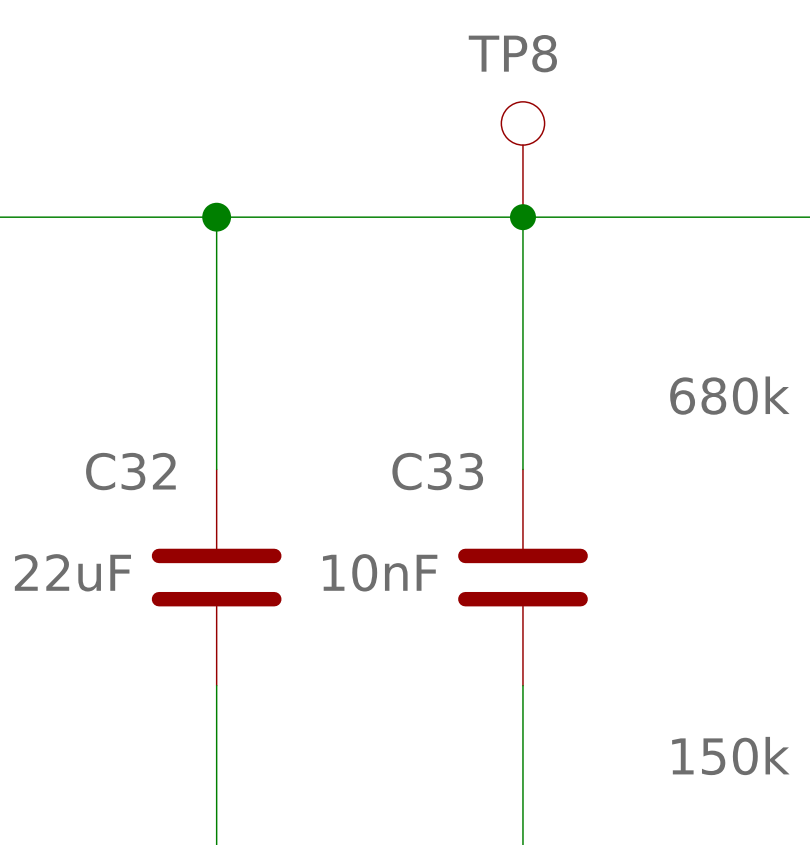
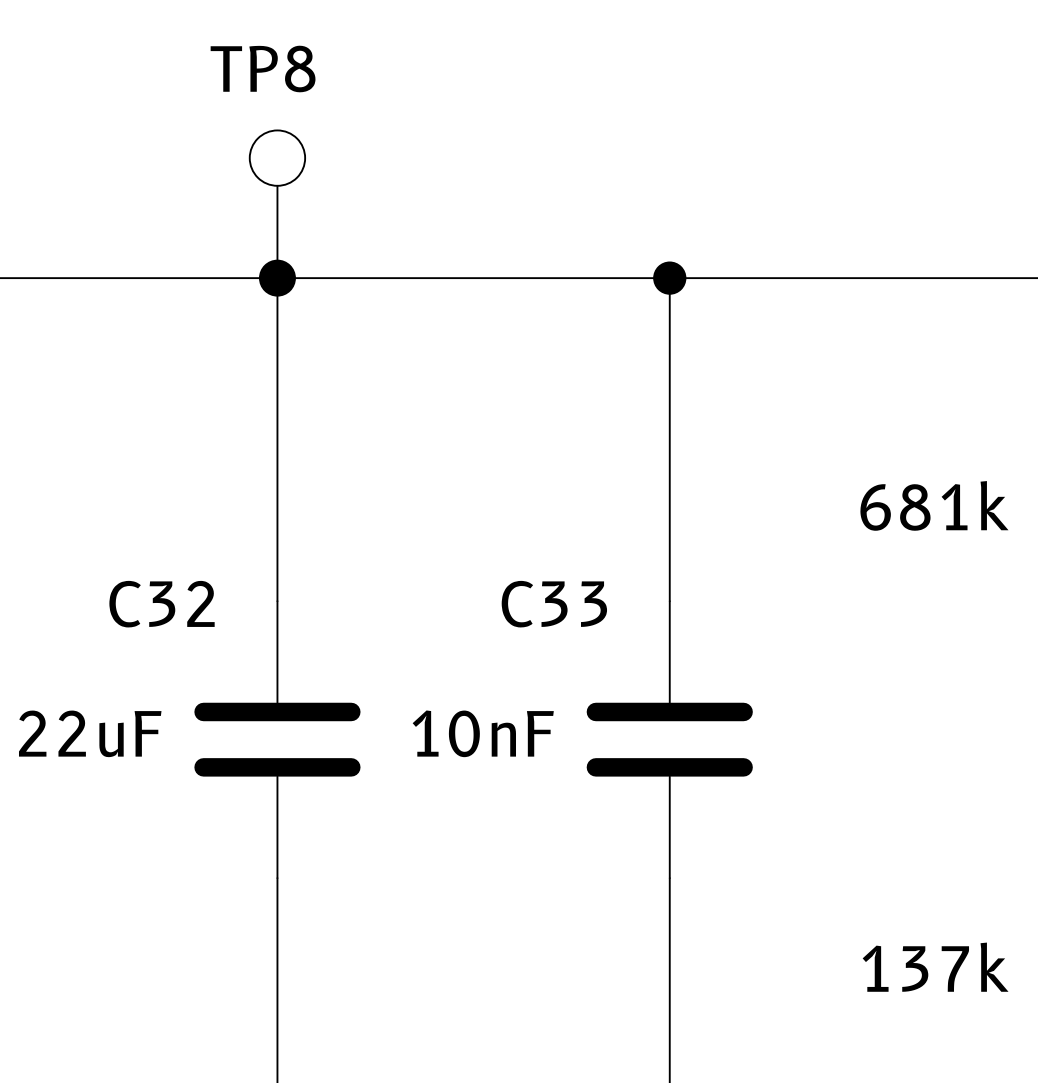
TP8 position: (522, 159) -> (277, 204)
part value: 680k (729, 395) -> 681k (934, 505)
part value: 150k (730, 756) -> 137k (935, 967)

